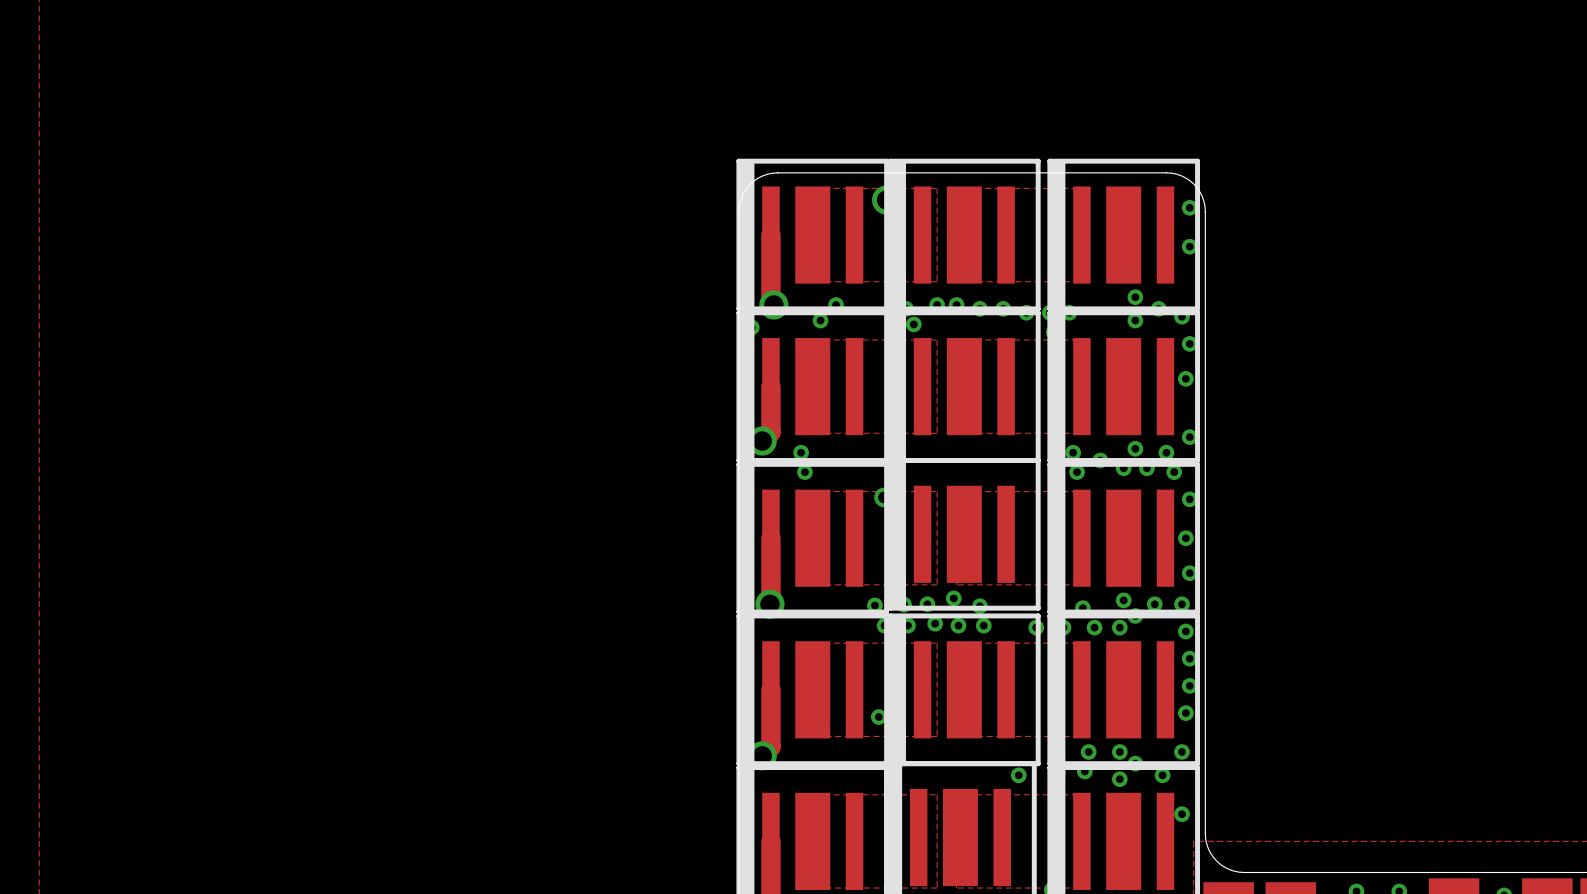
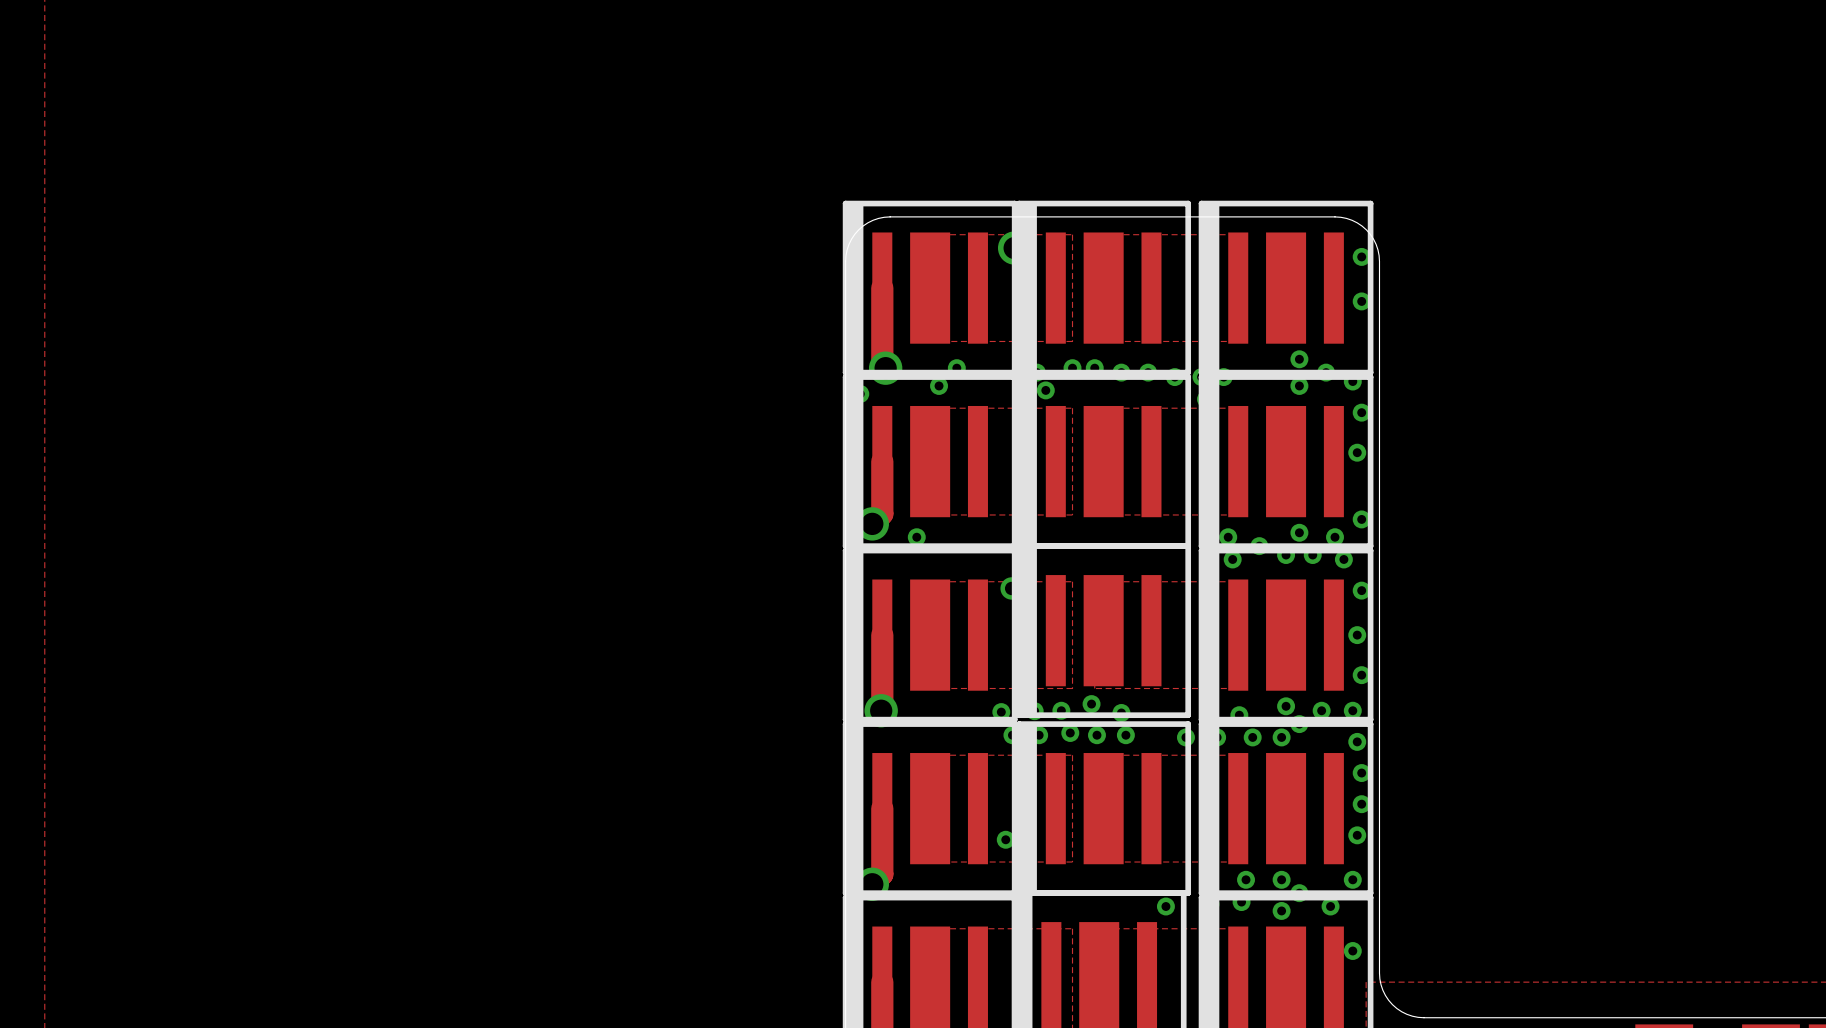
via: (804, 472) -> none

